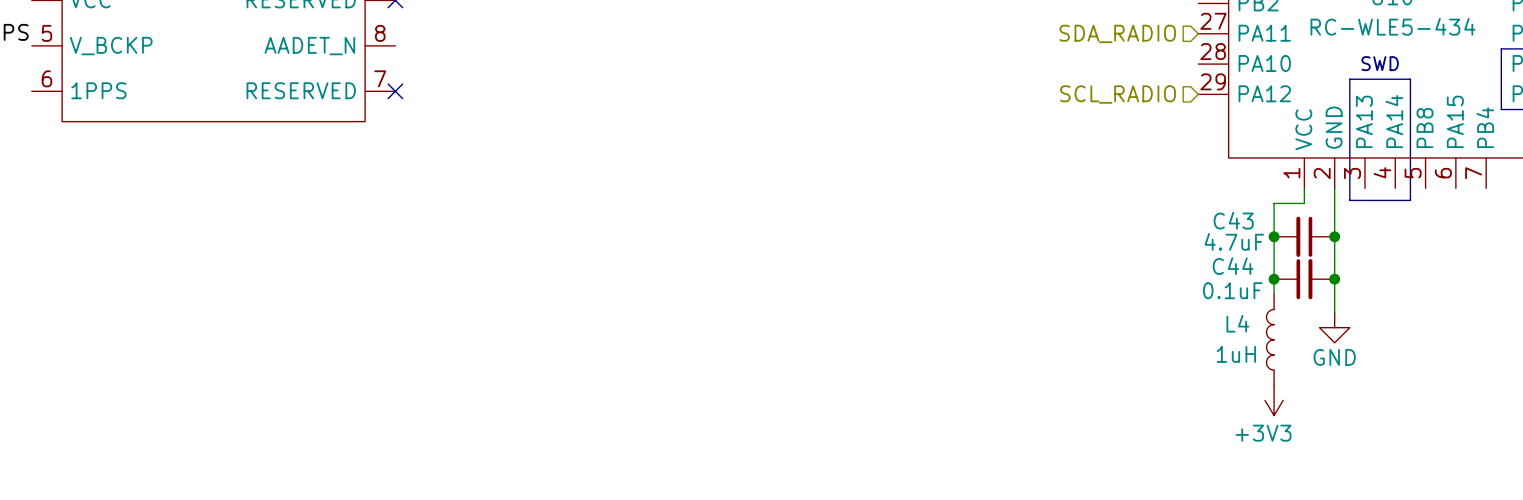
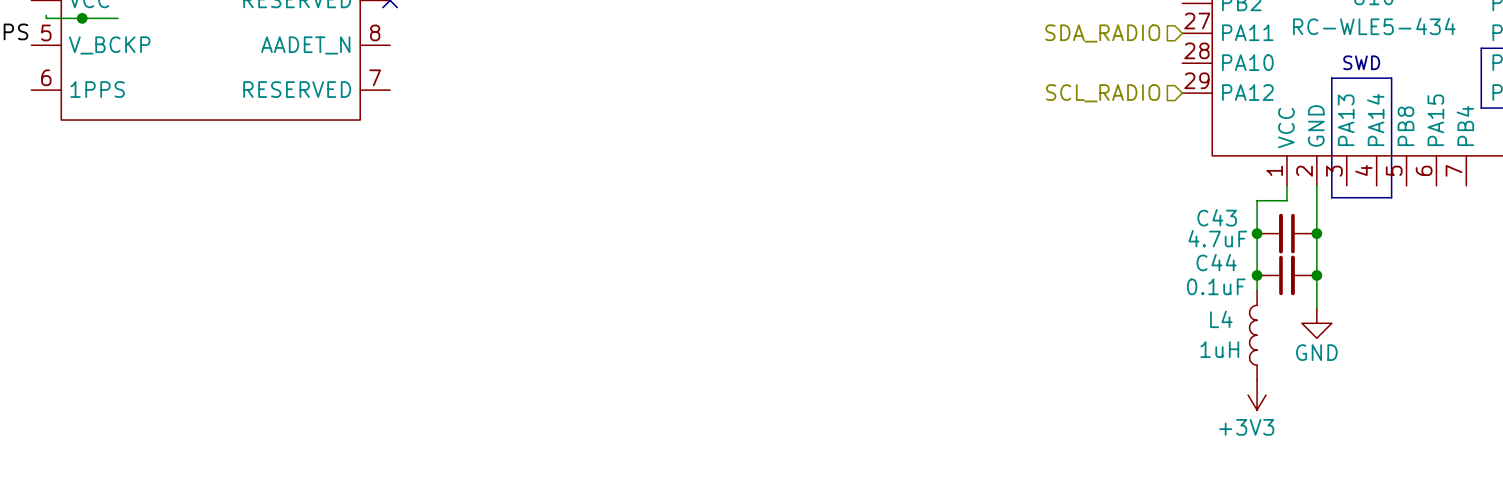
wire: none -> (46, 15) (46, 18) (118, 18)
junction: none -> (82, 18)
no-connect mark: (395, 91) -> none

